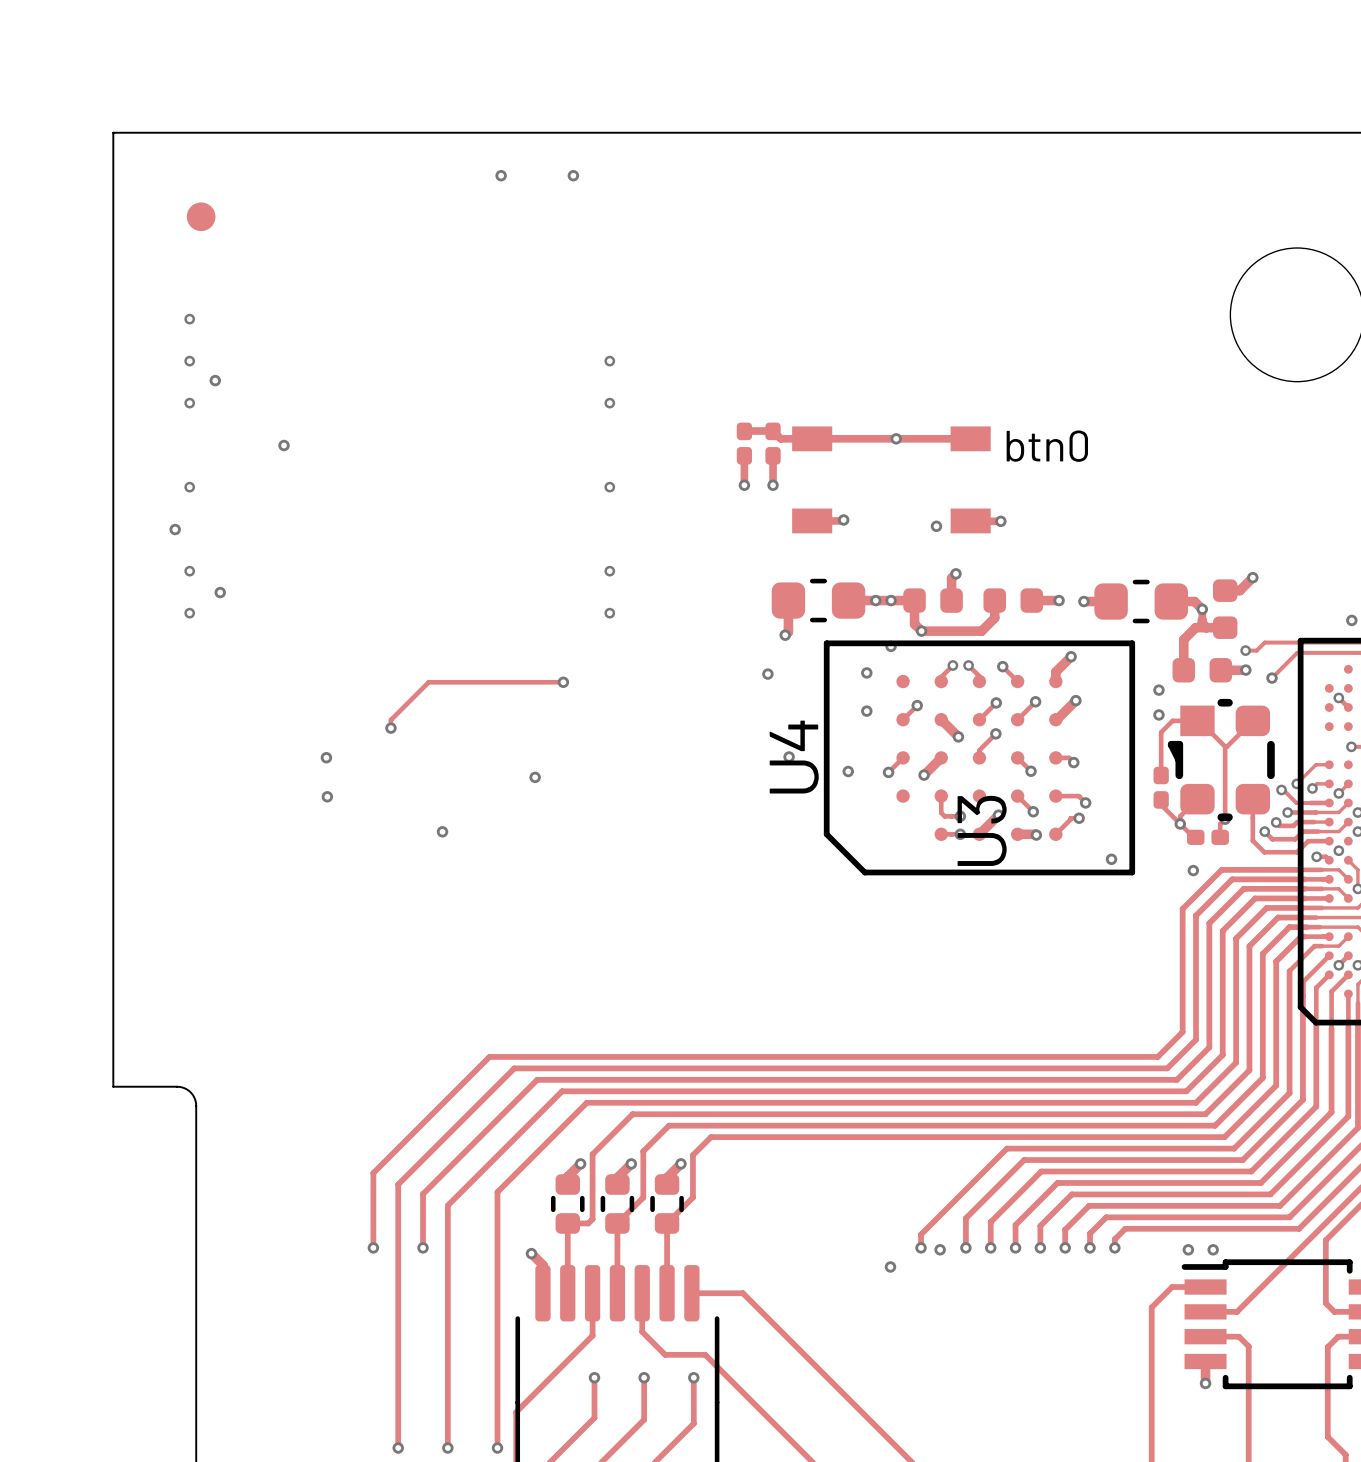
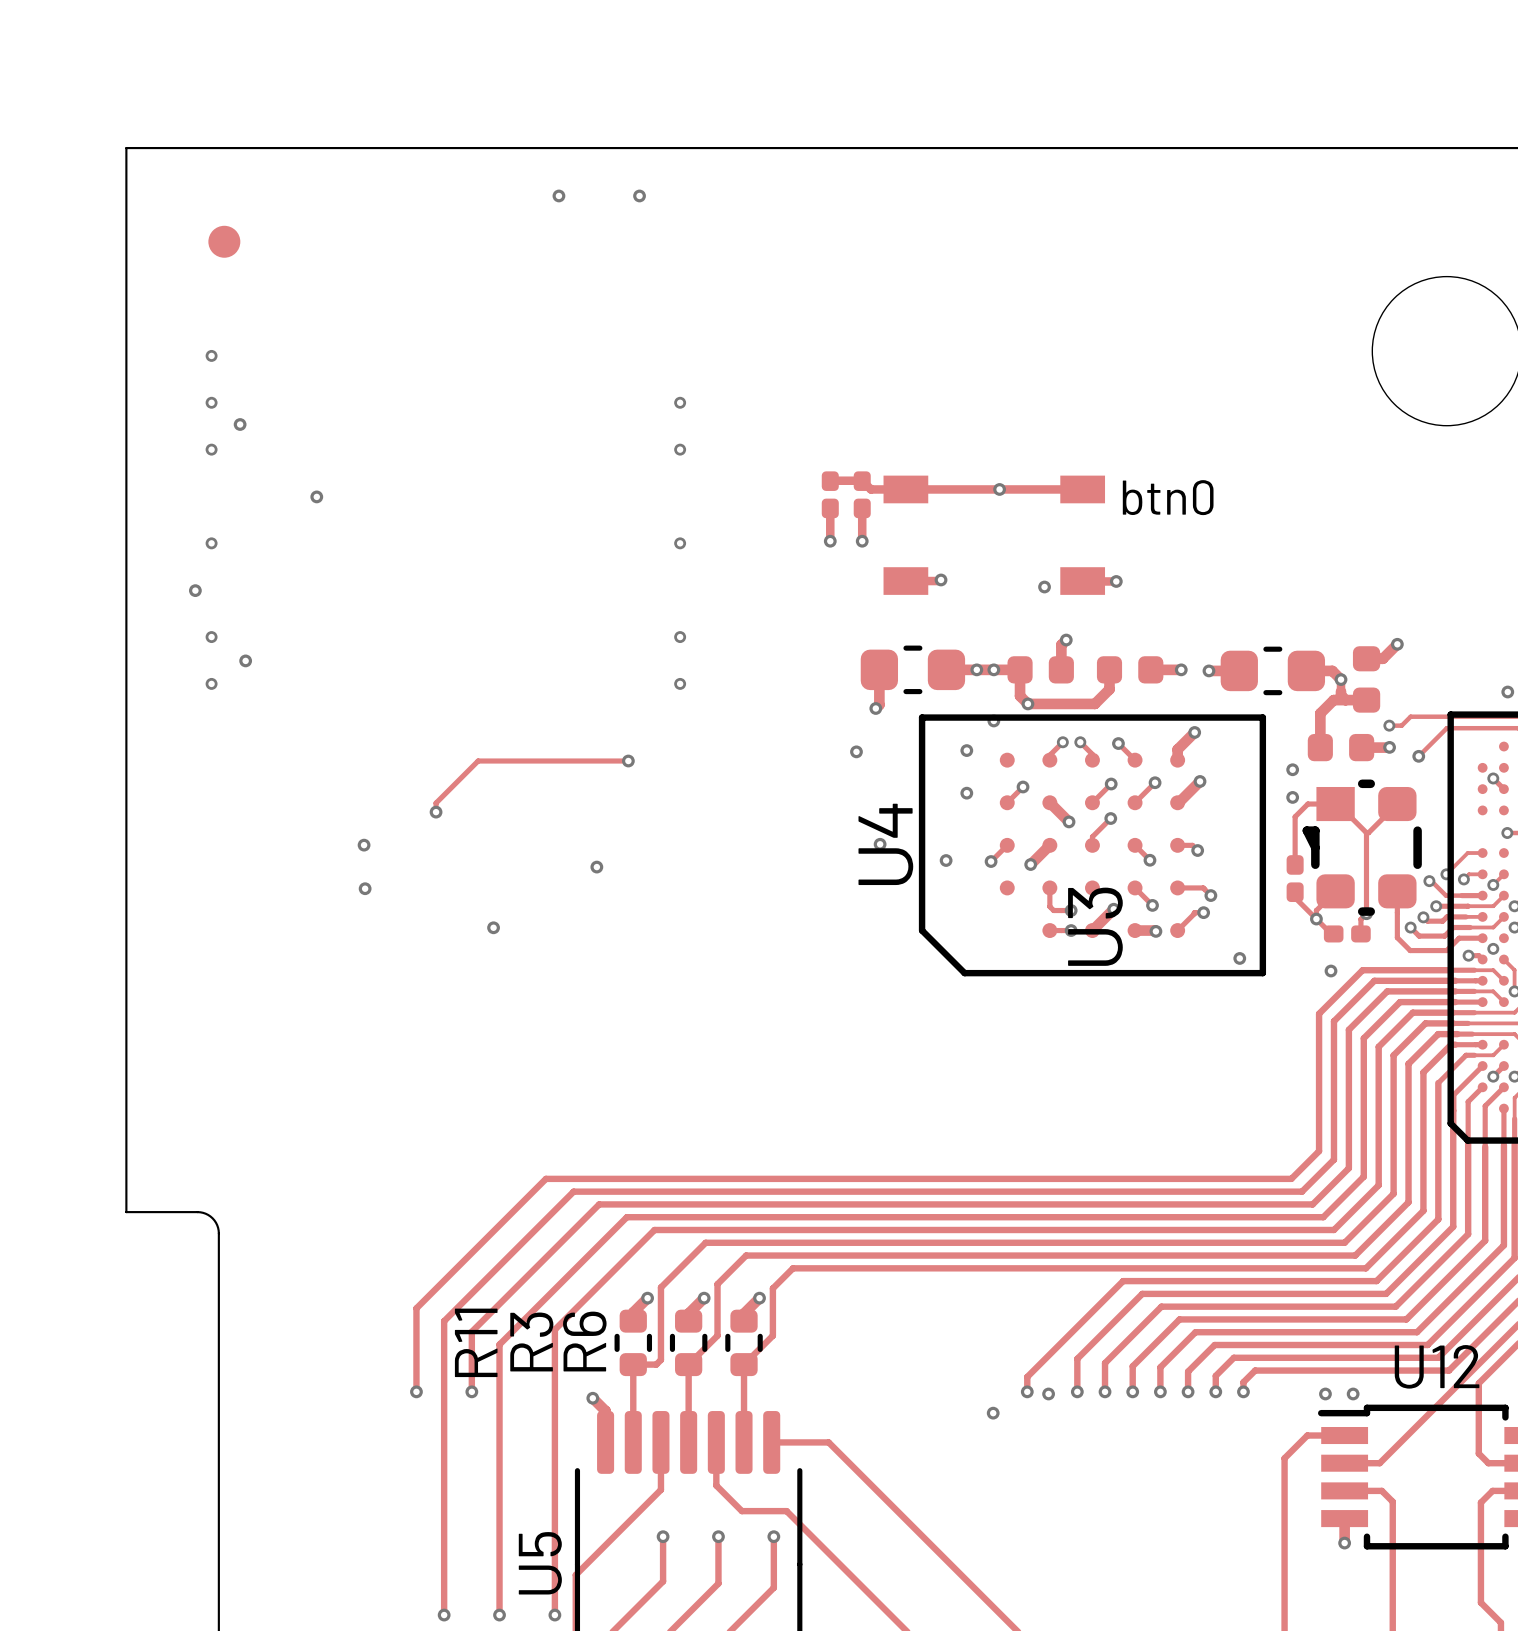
R6 name: none -> R6 (584, 1341)
R11 name: none -> R11 (476, 1342)
R3 name: none -> R3 (531, 1341)
U12 name: none -> U12 (1437, 1366)
U5 name: none -> U5 (540, 1563)

